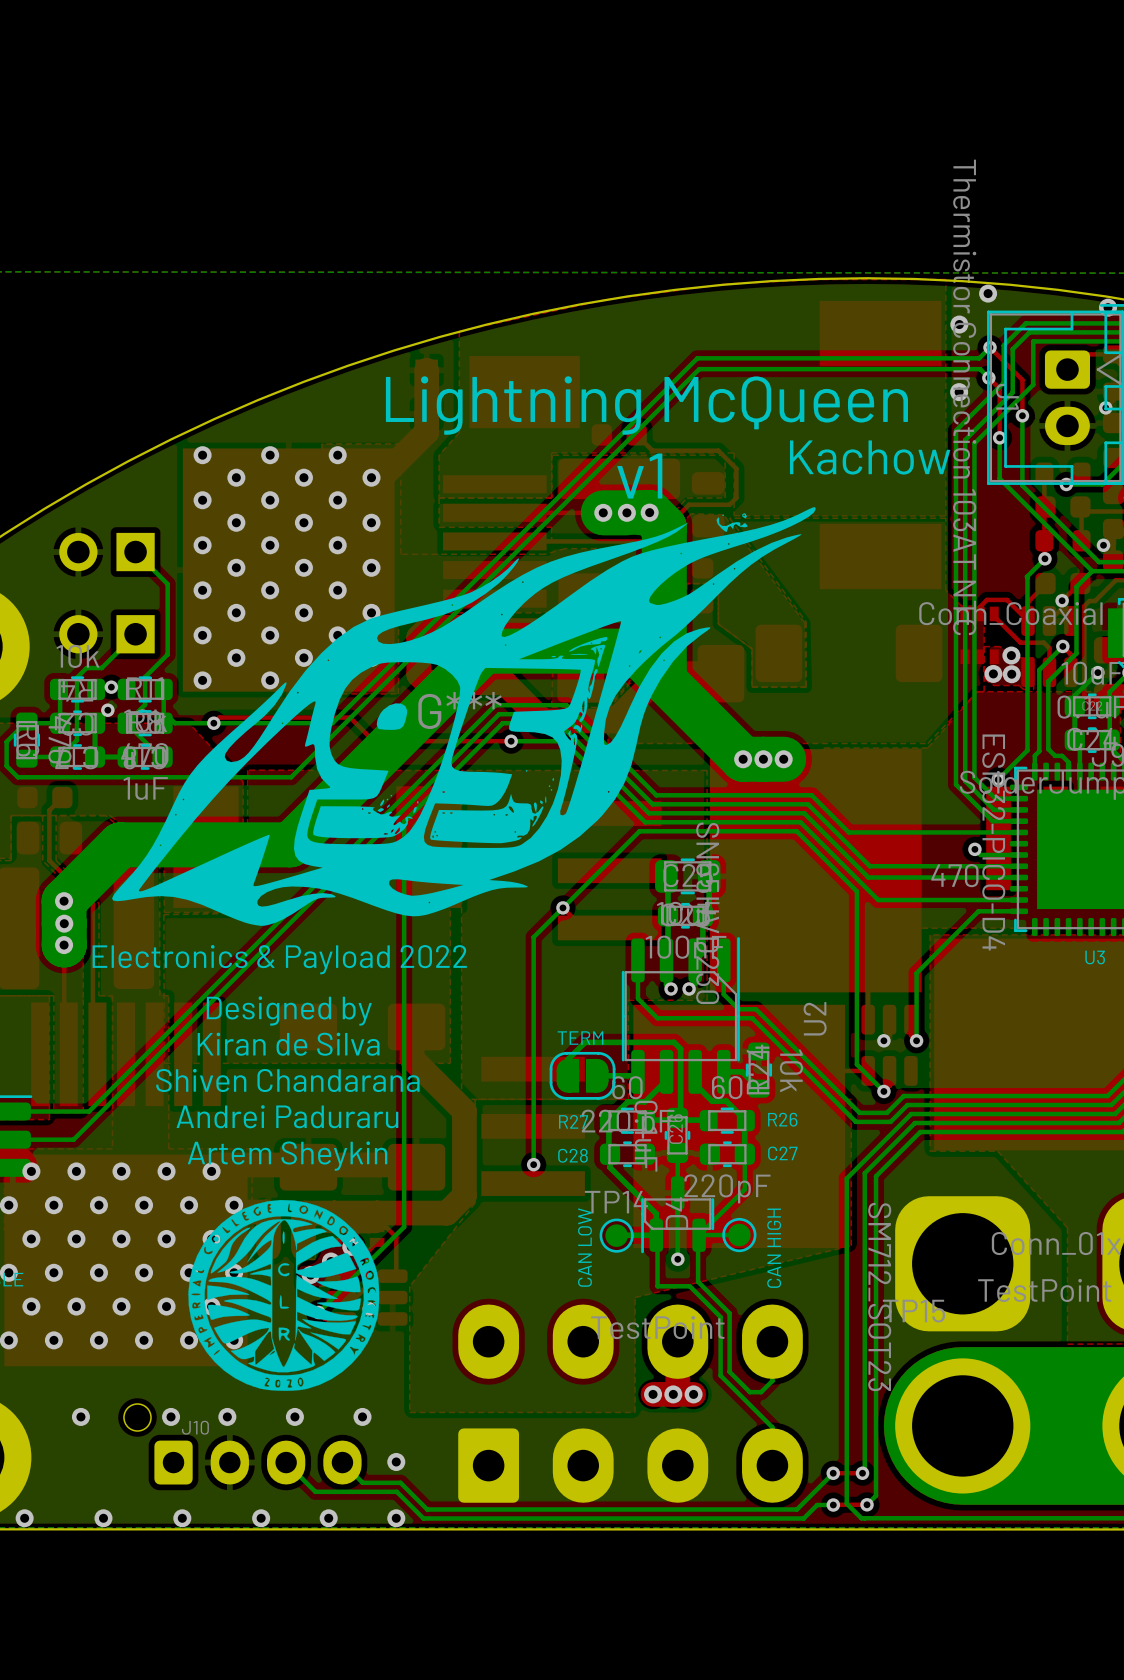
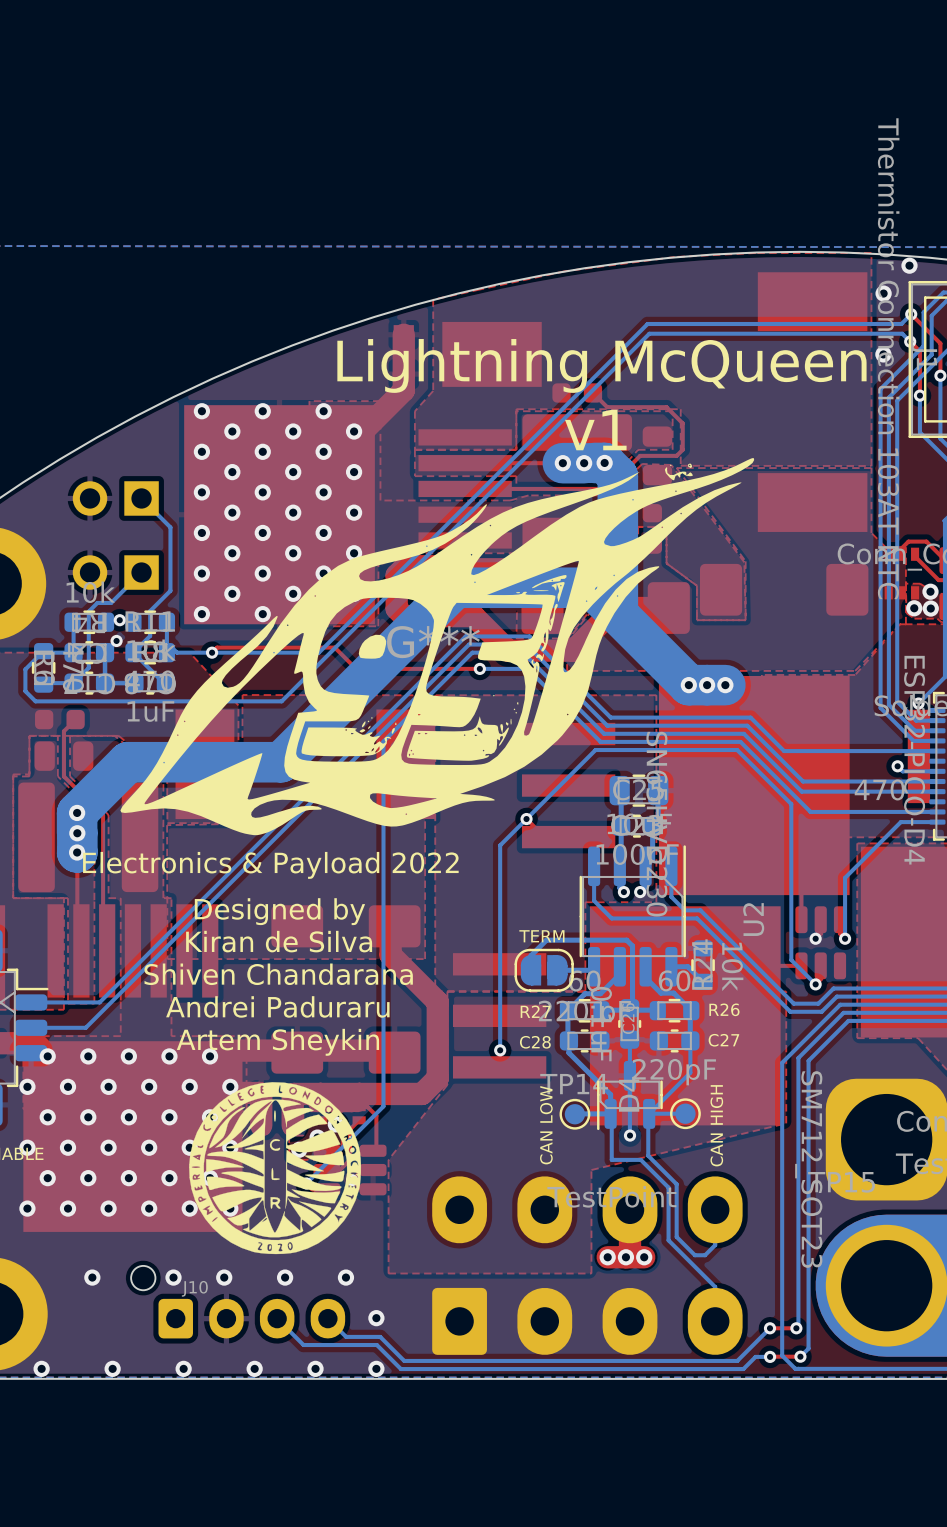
text: Kachow (870, 457) -> none

